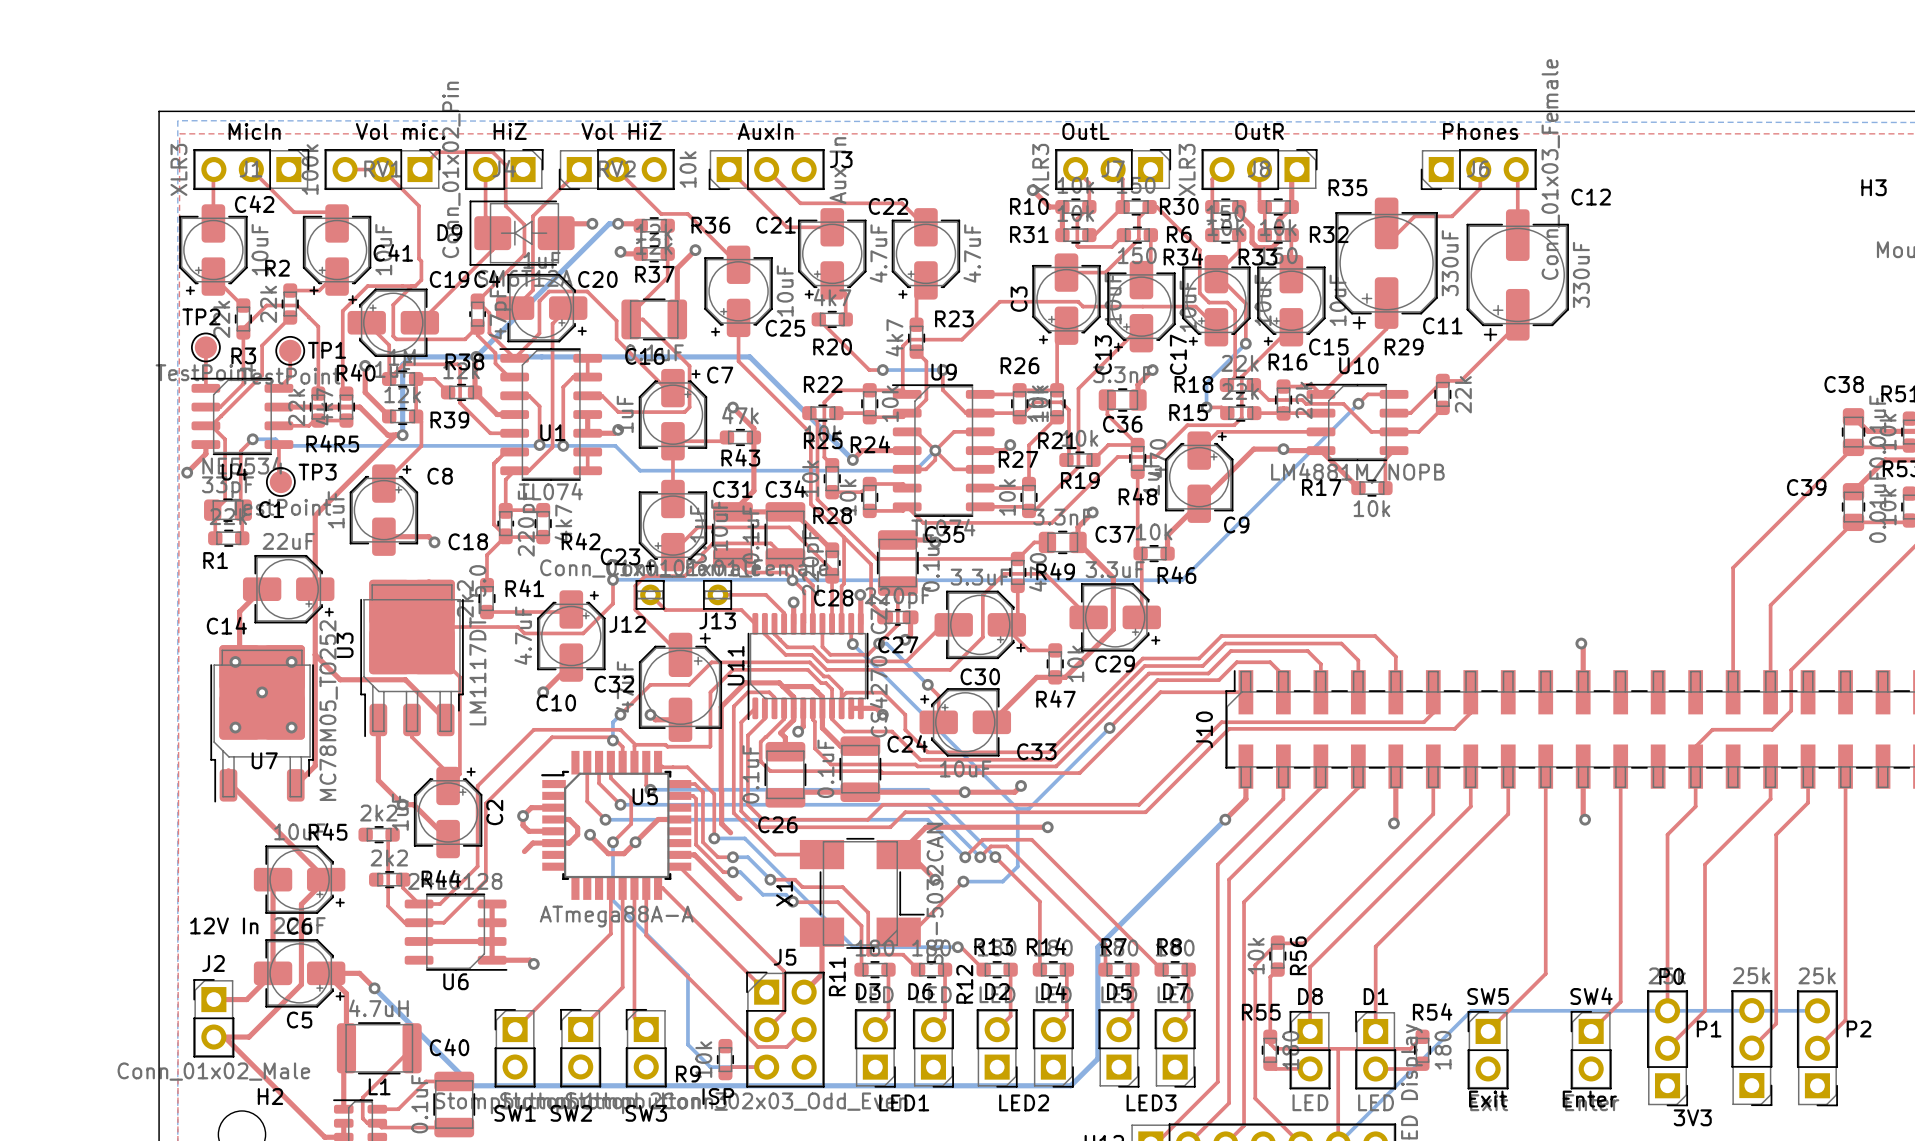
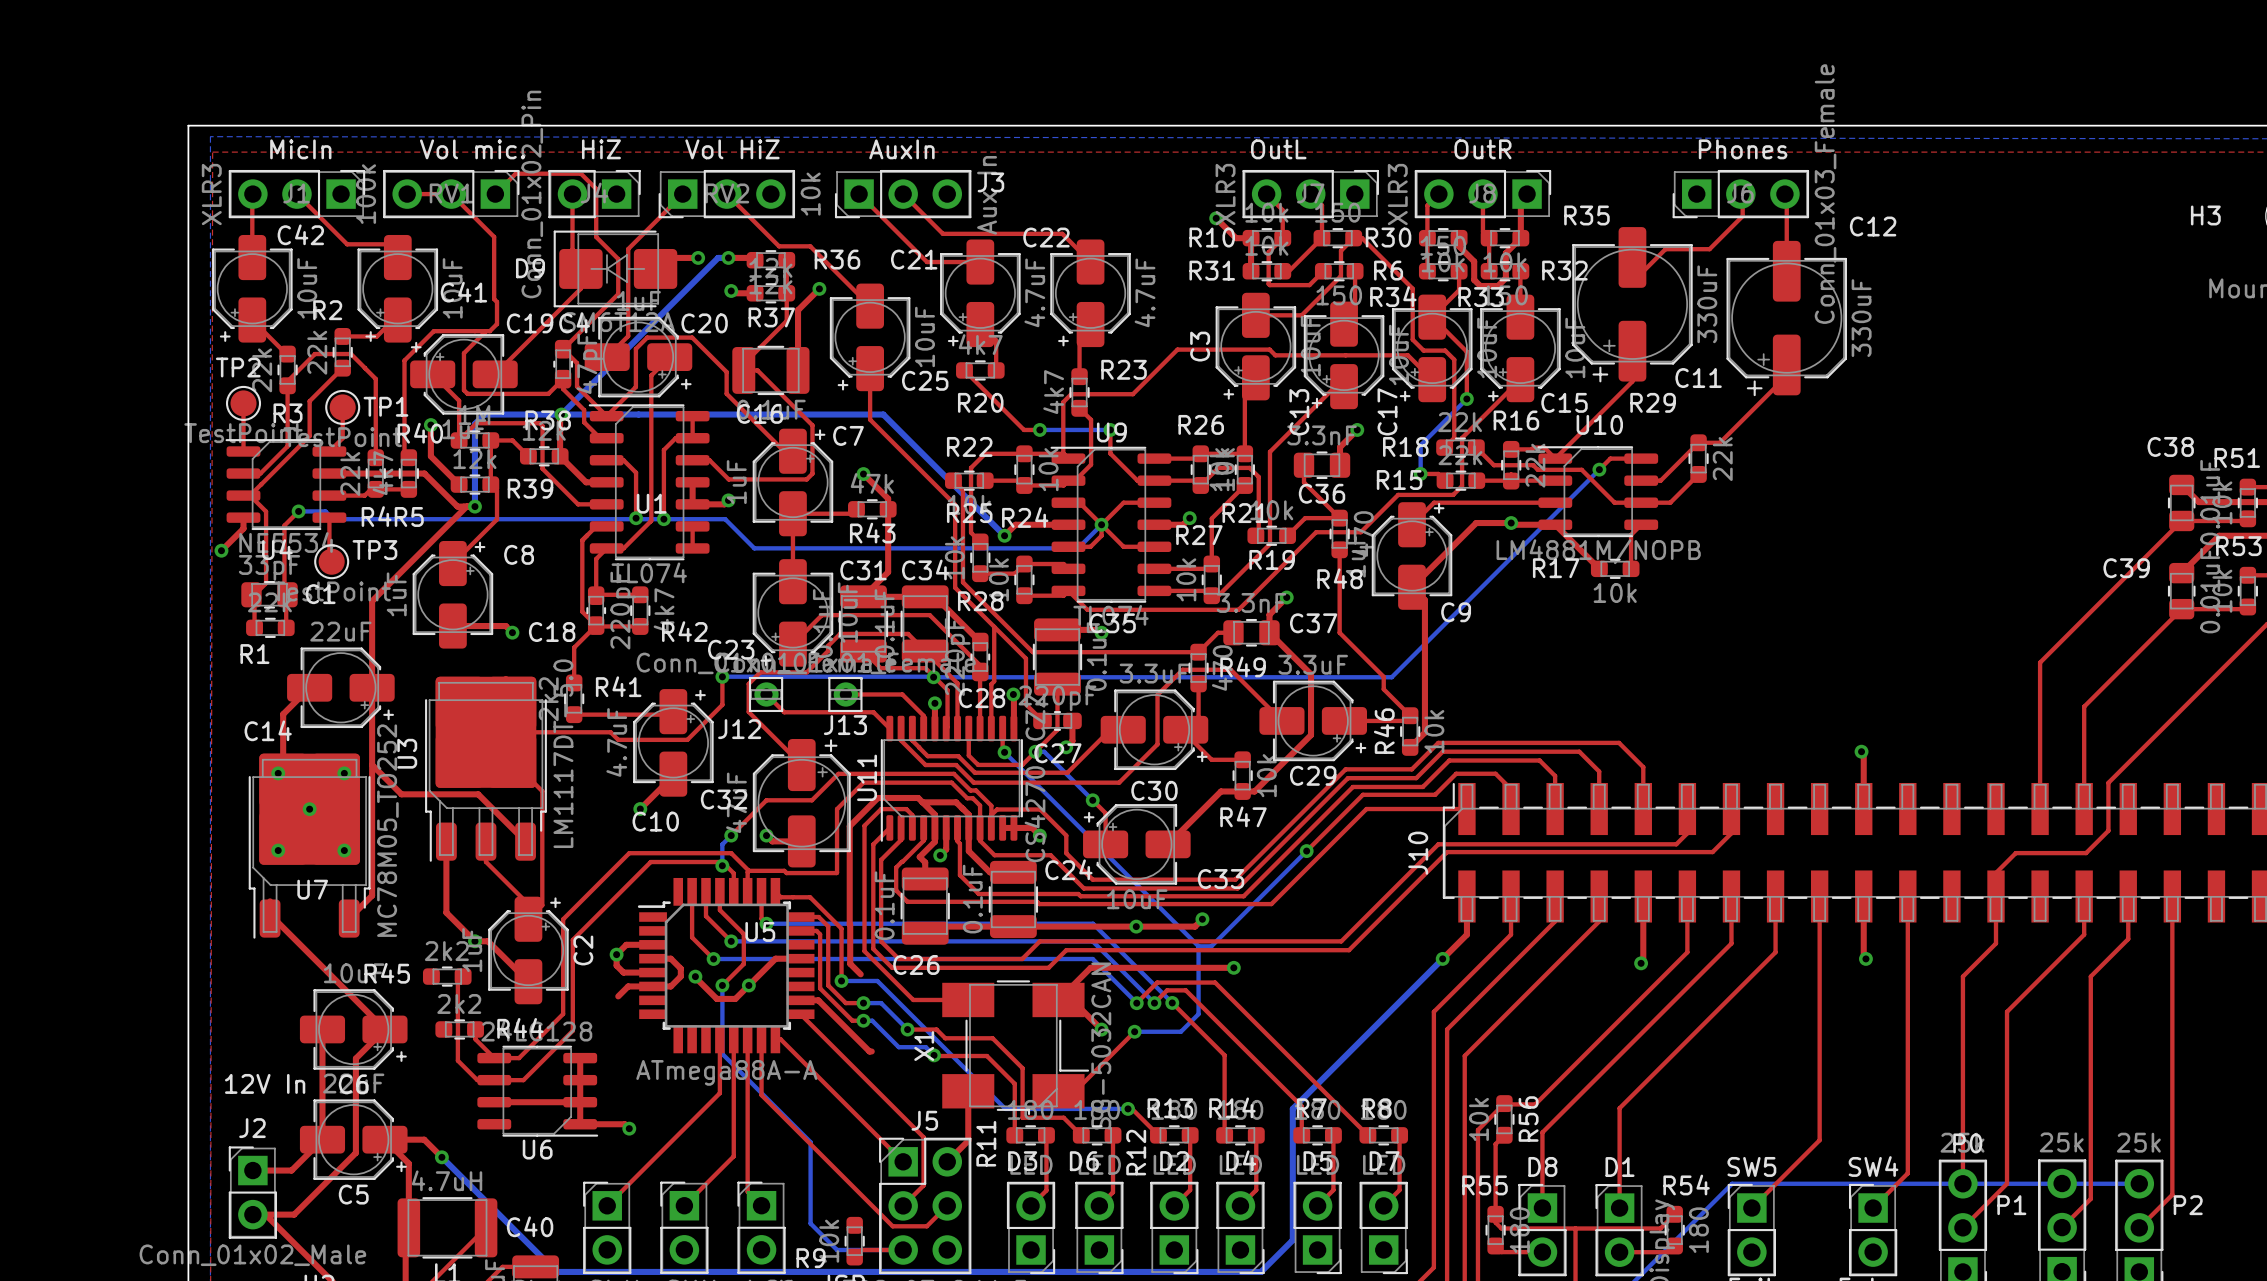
top track: (1199, 503) (1167, 535) (1167, 553) -> (1412, 587) (1424, 600) (1424, 732) (1410, 747)
top track: (1137, 542) (1137, 550) (1141, 554) (1141, 617) -> (1339, 632) (1383, 676) (1383, 689) (1410, 715) (1404, 720) (1344, 720)
R46 rotation: 0° (1154, 553) -> 90° clockwise (1410, 731)
R46 position: (1154, 553) -> (1410, 731)

